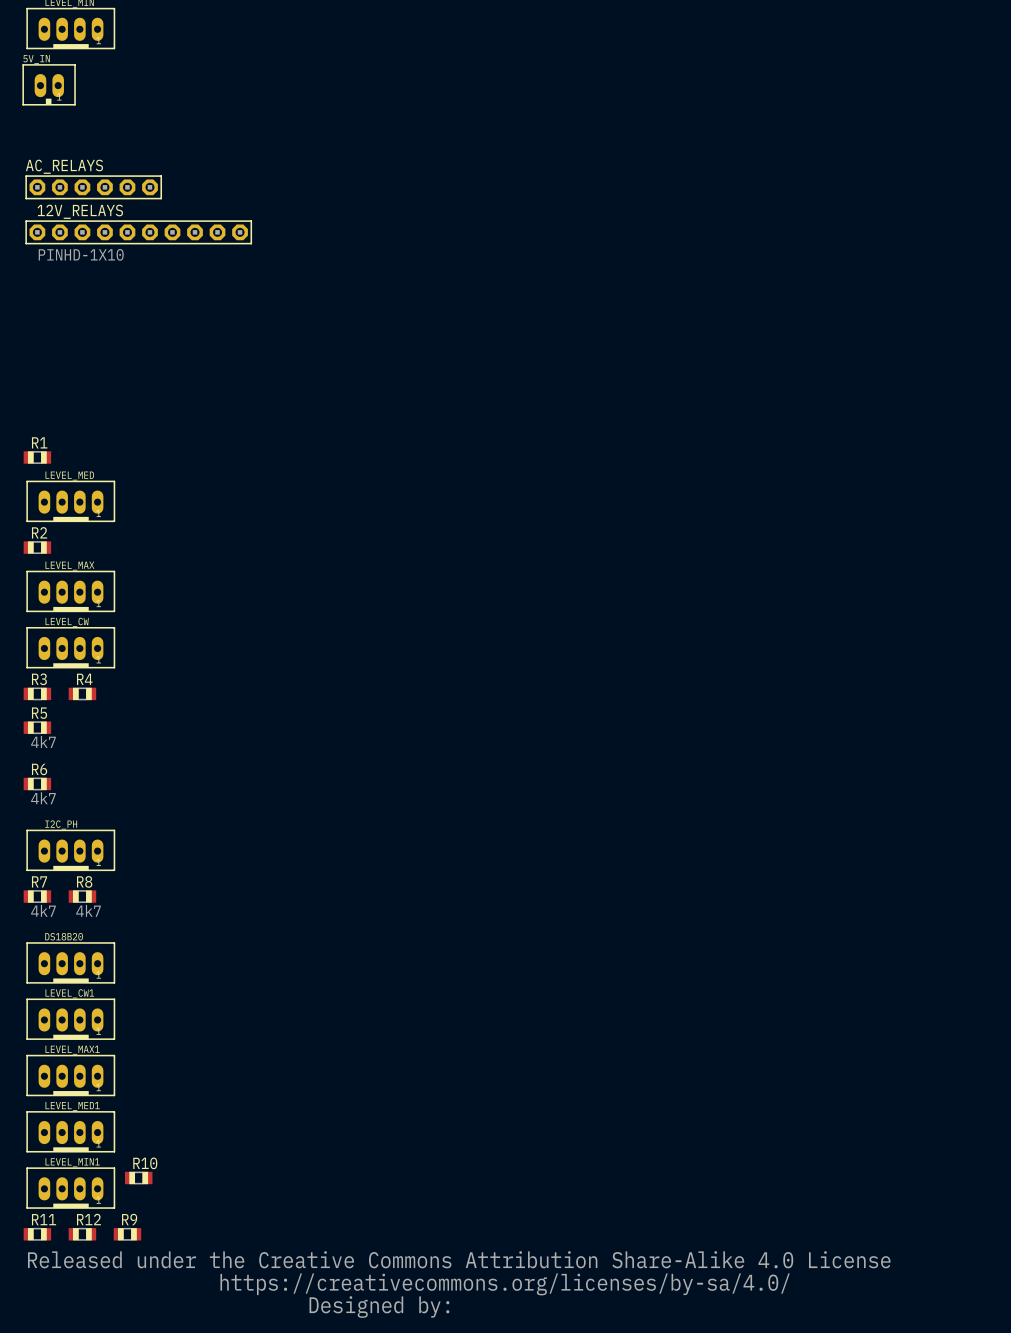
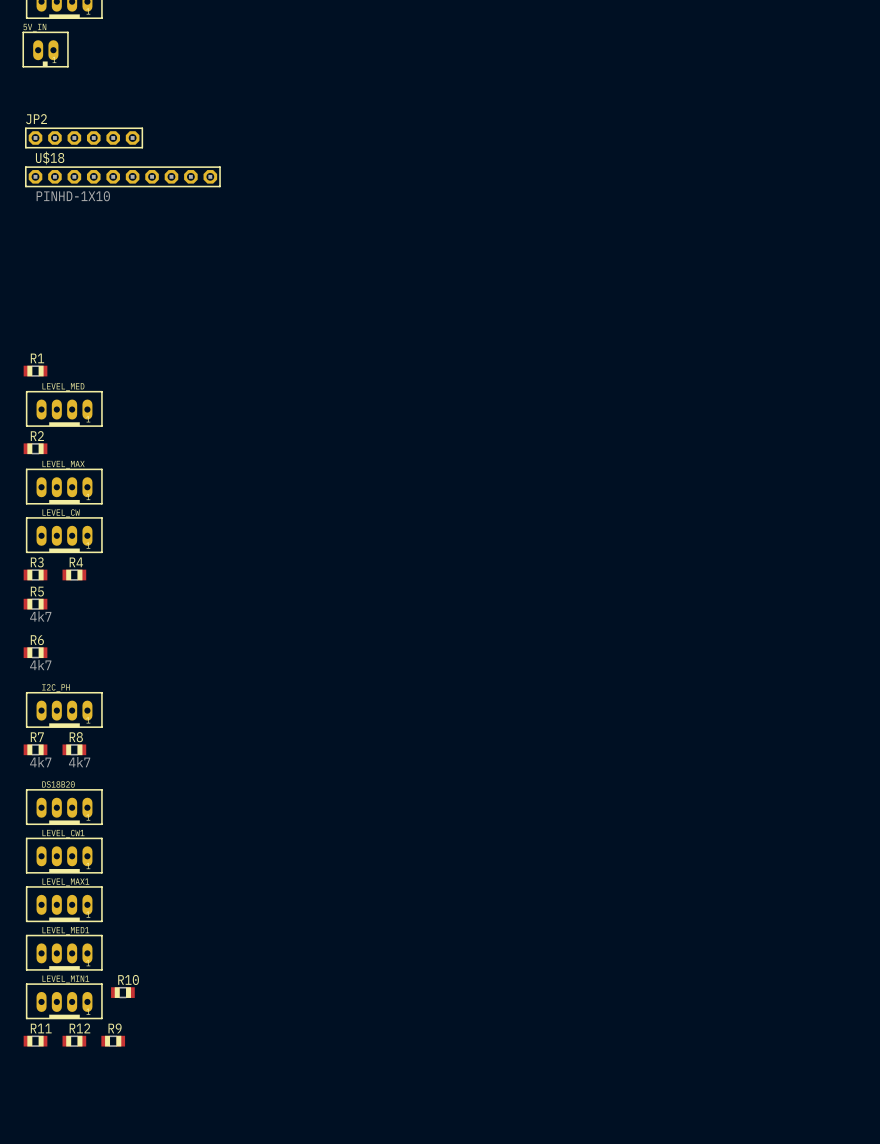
AC_RELAYS name: AC_RELAYS (64, 166) -> JP2 (36, 119)
12V_RELAYS name: 12V_RELAYS (80, 211) -> U$18 (50, 157)
drawing: [27, 1251, 891, 1318] -> none

